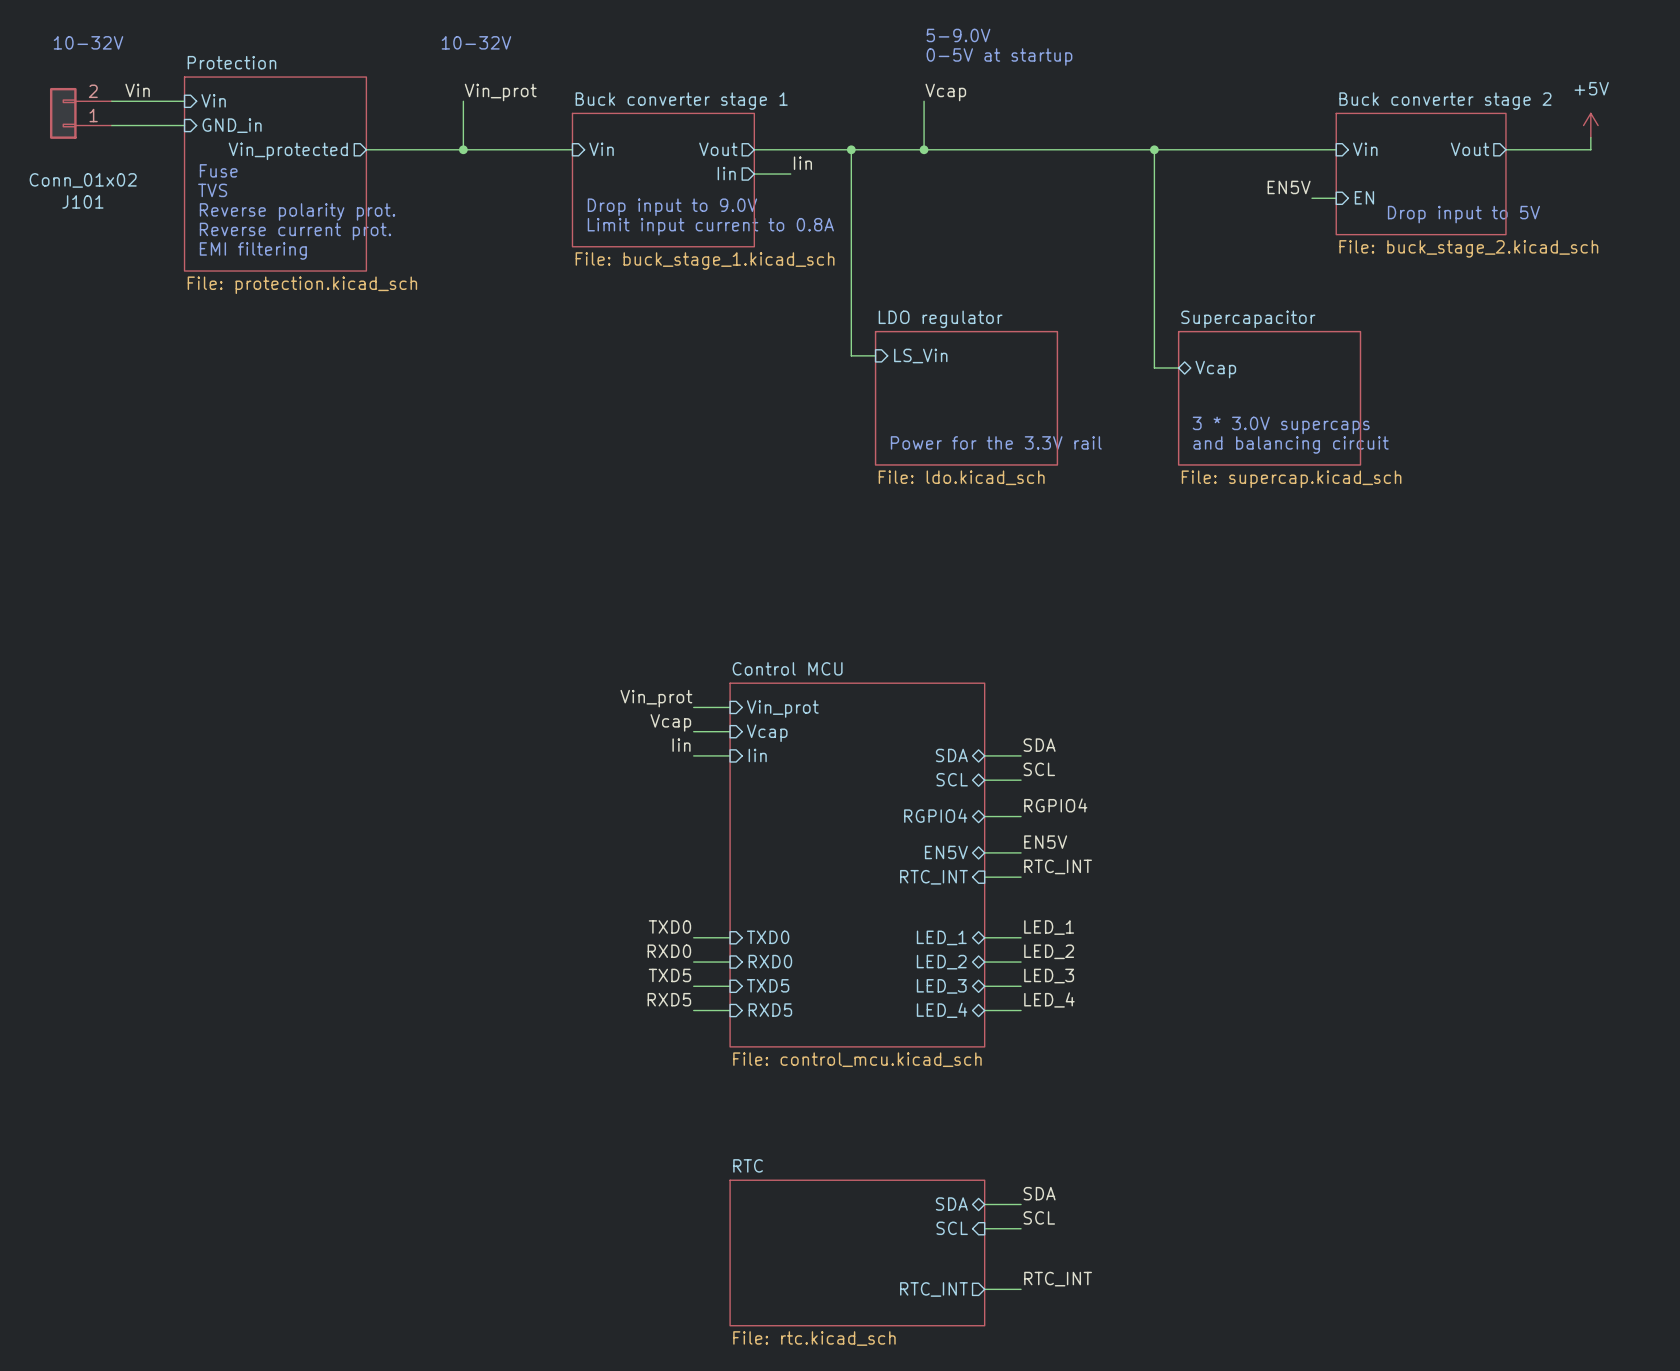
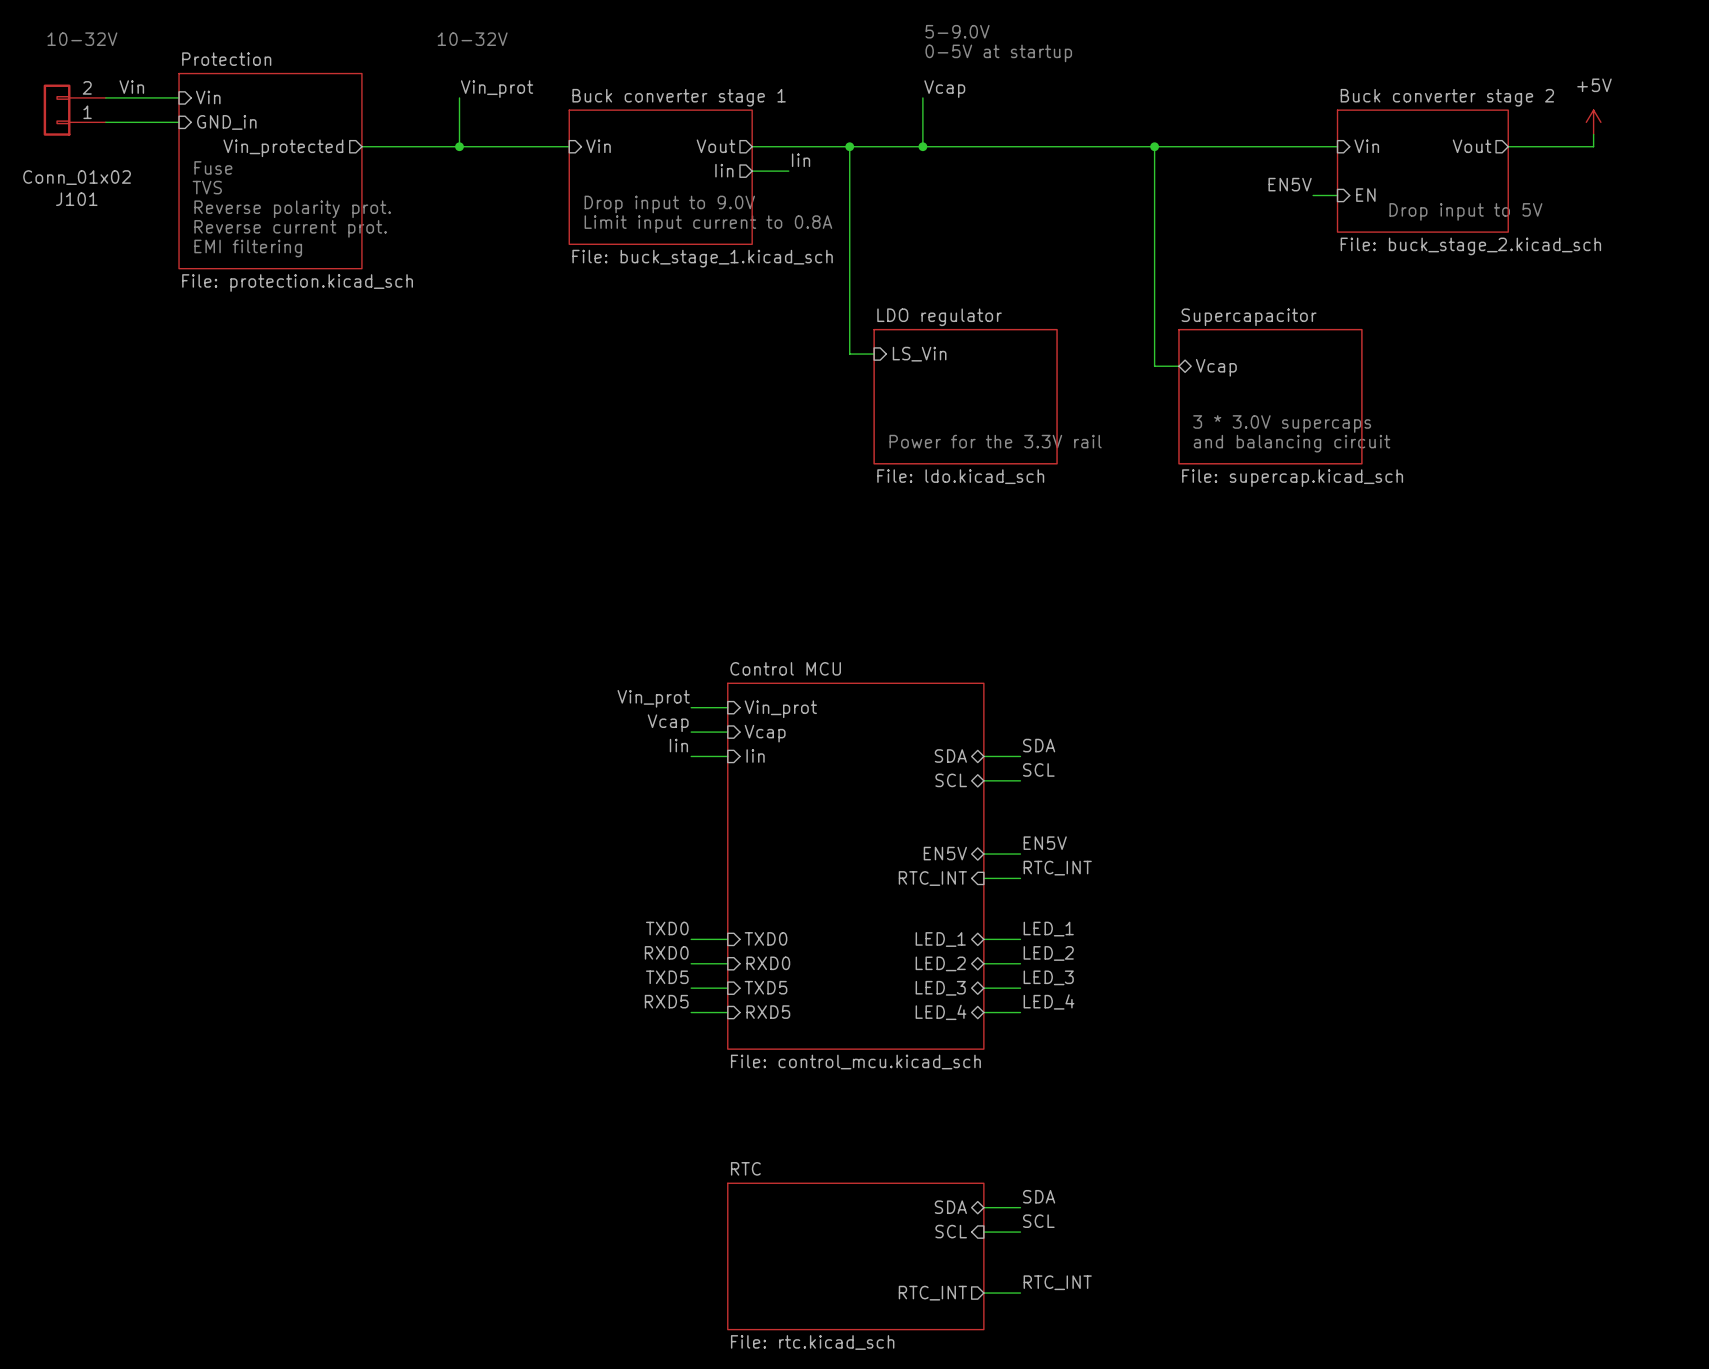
label: RGPIO4 (1055, 805) -> none
sheet pin: RGPIO4 (935, 815) -> none
wire: (984, 816) (1021, 816) -> none

